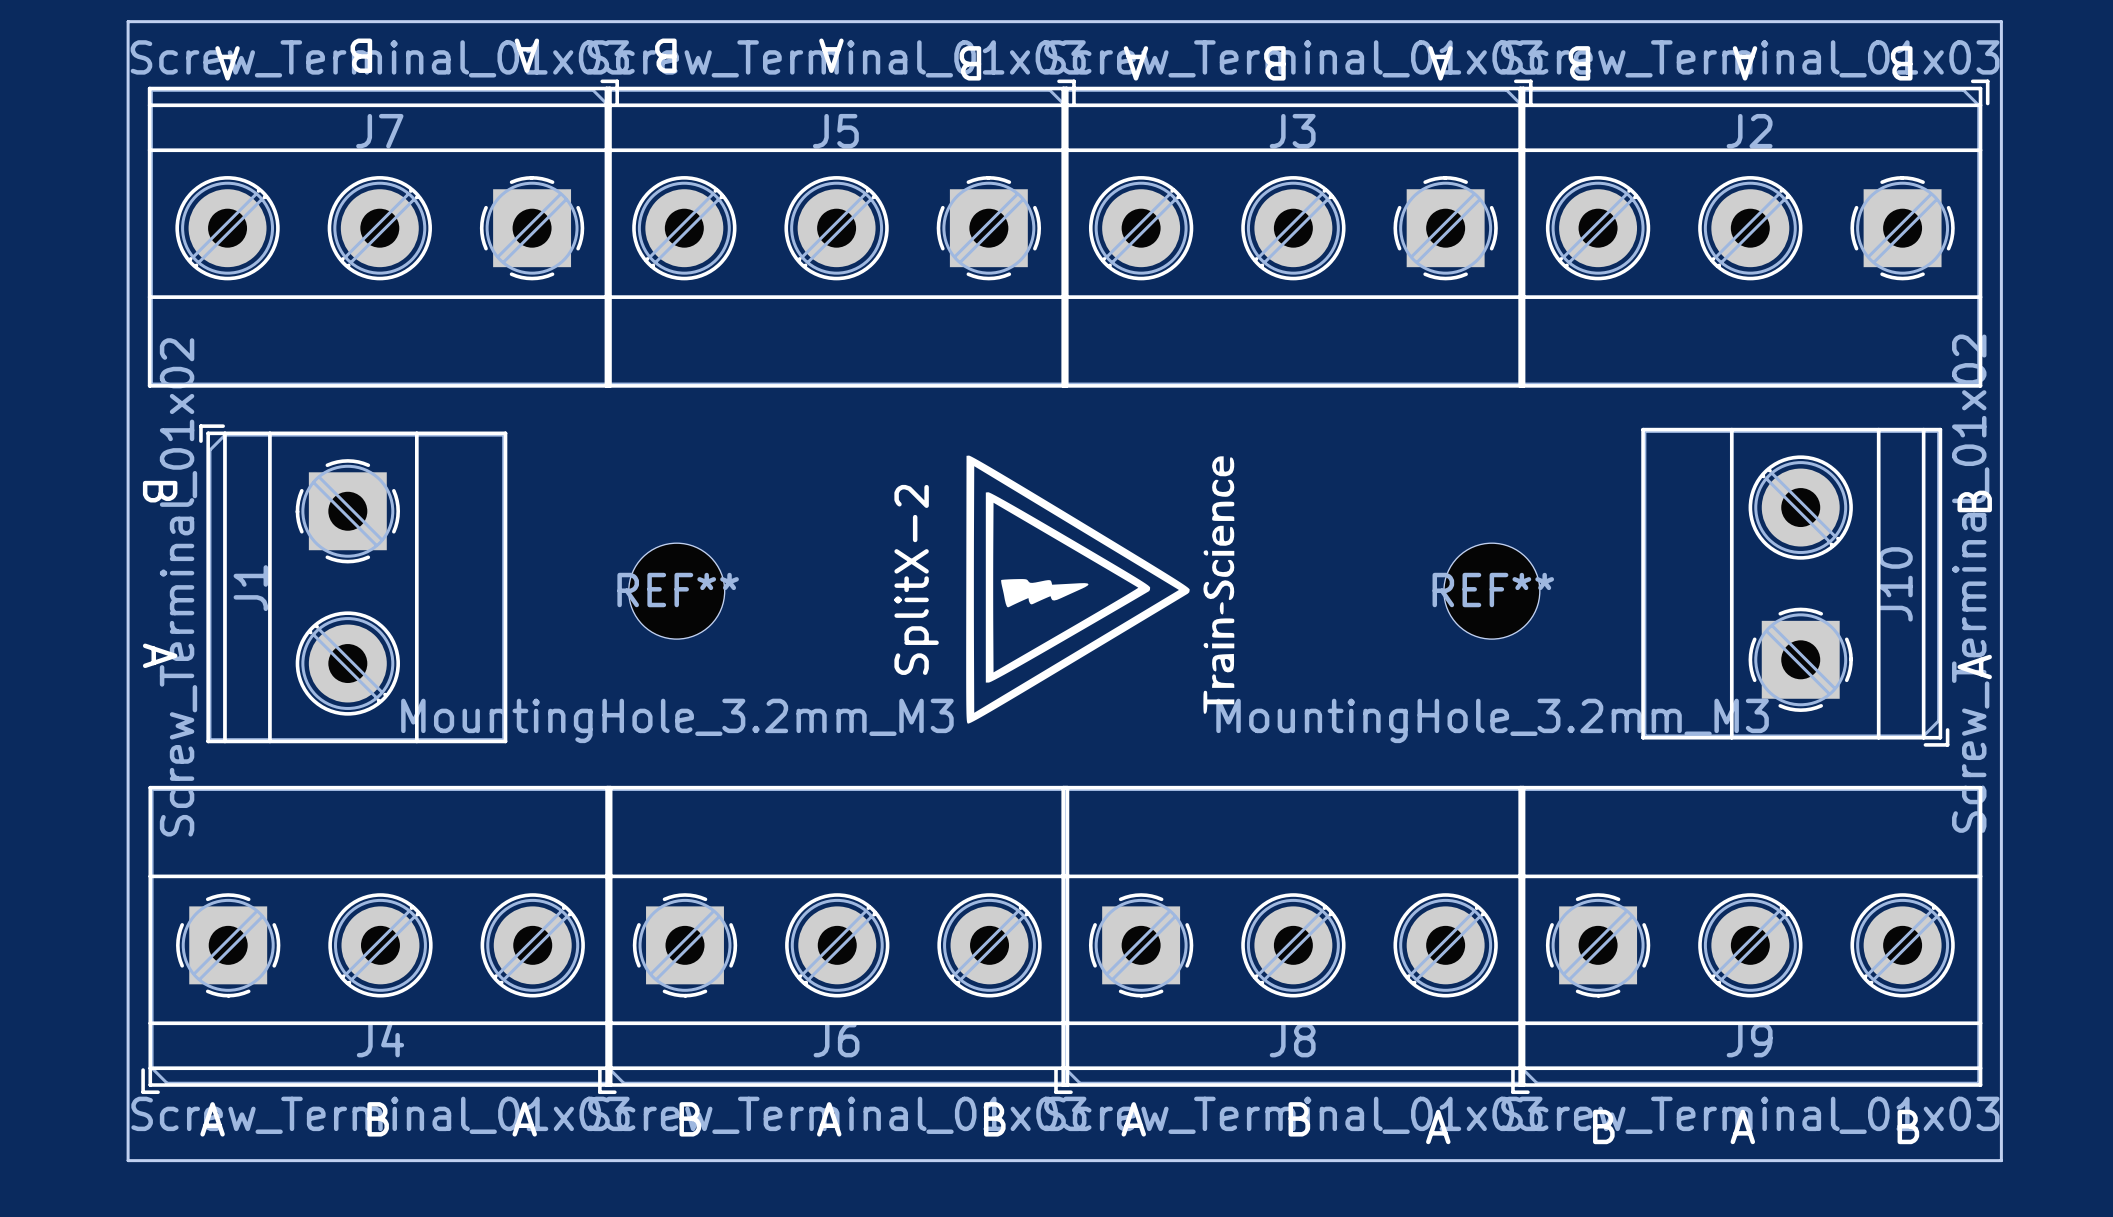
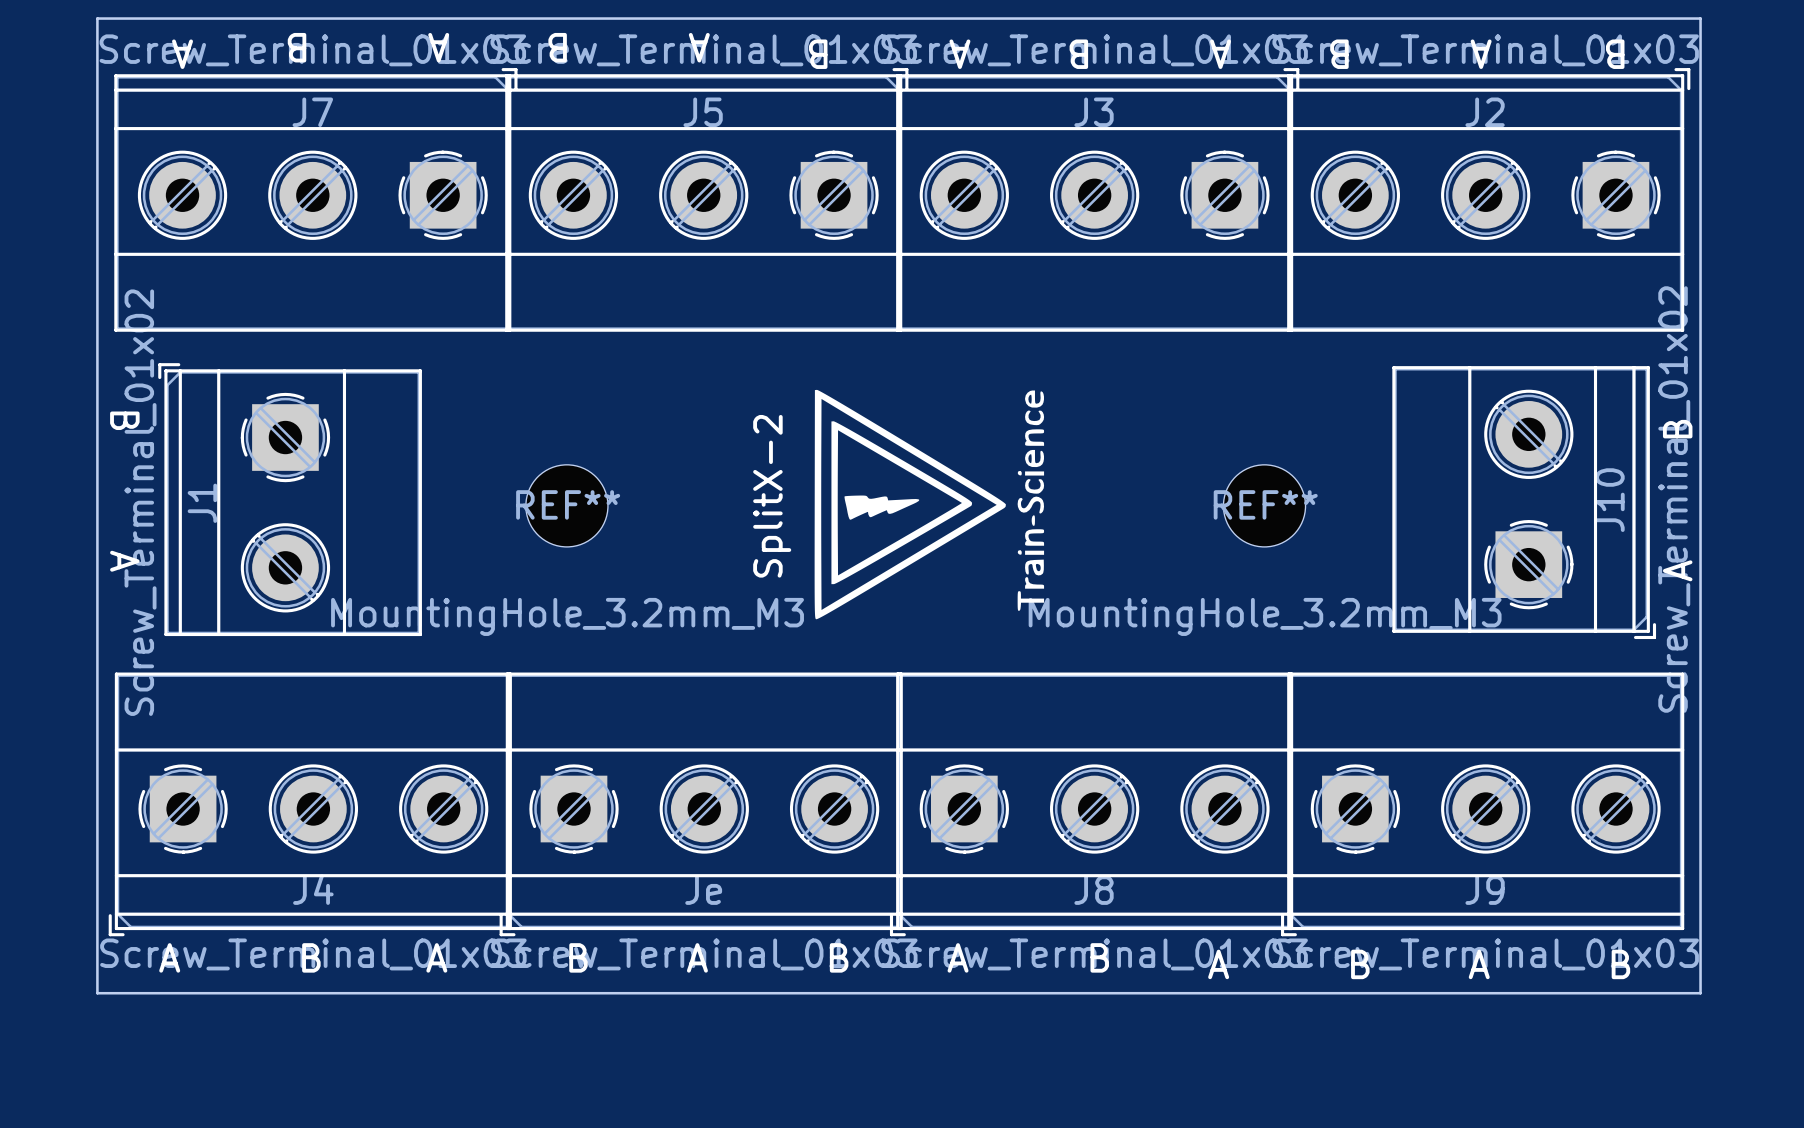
J6 name: J6 (836, 1040) -> Je (703, 890)

